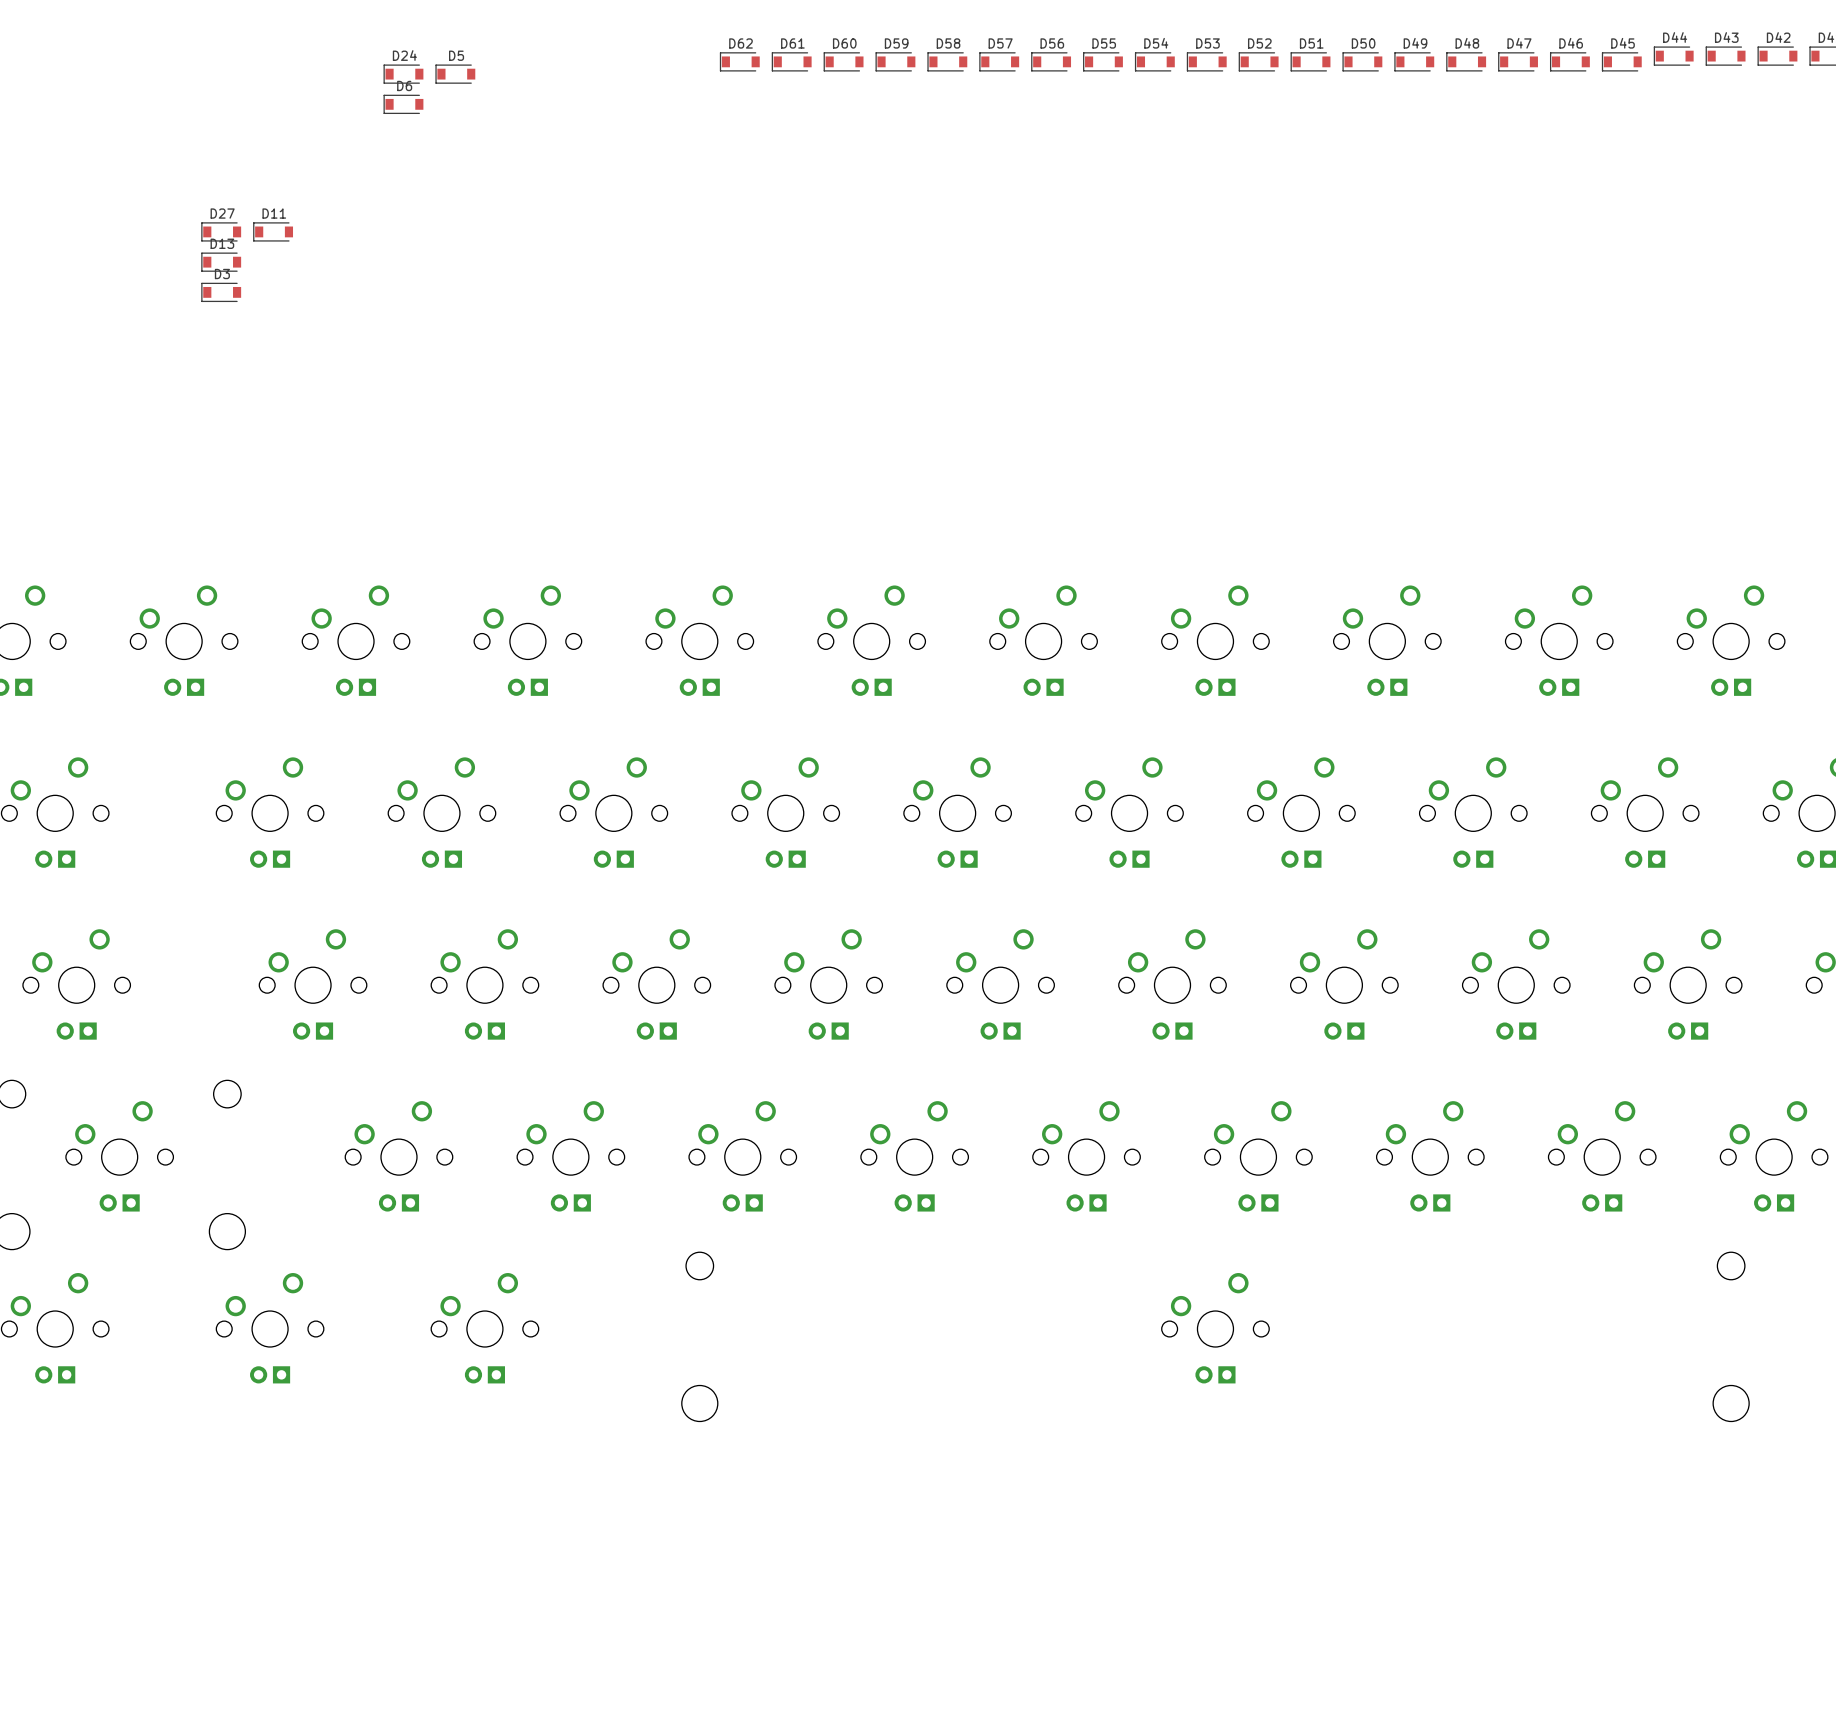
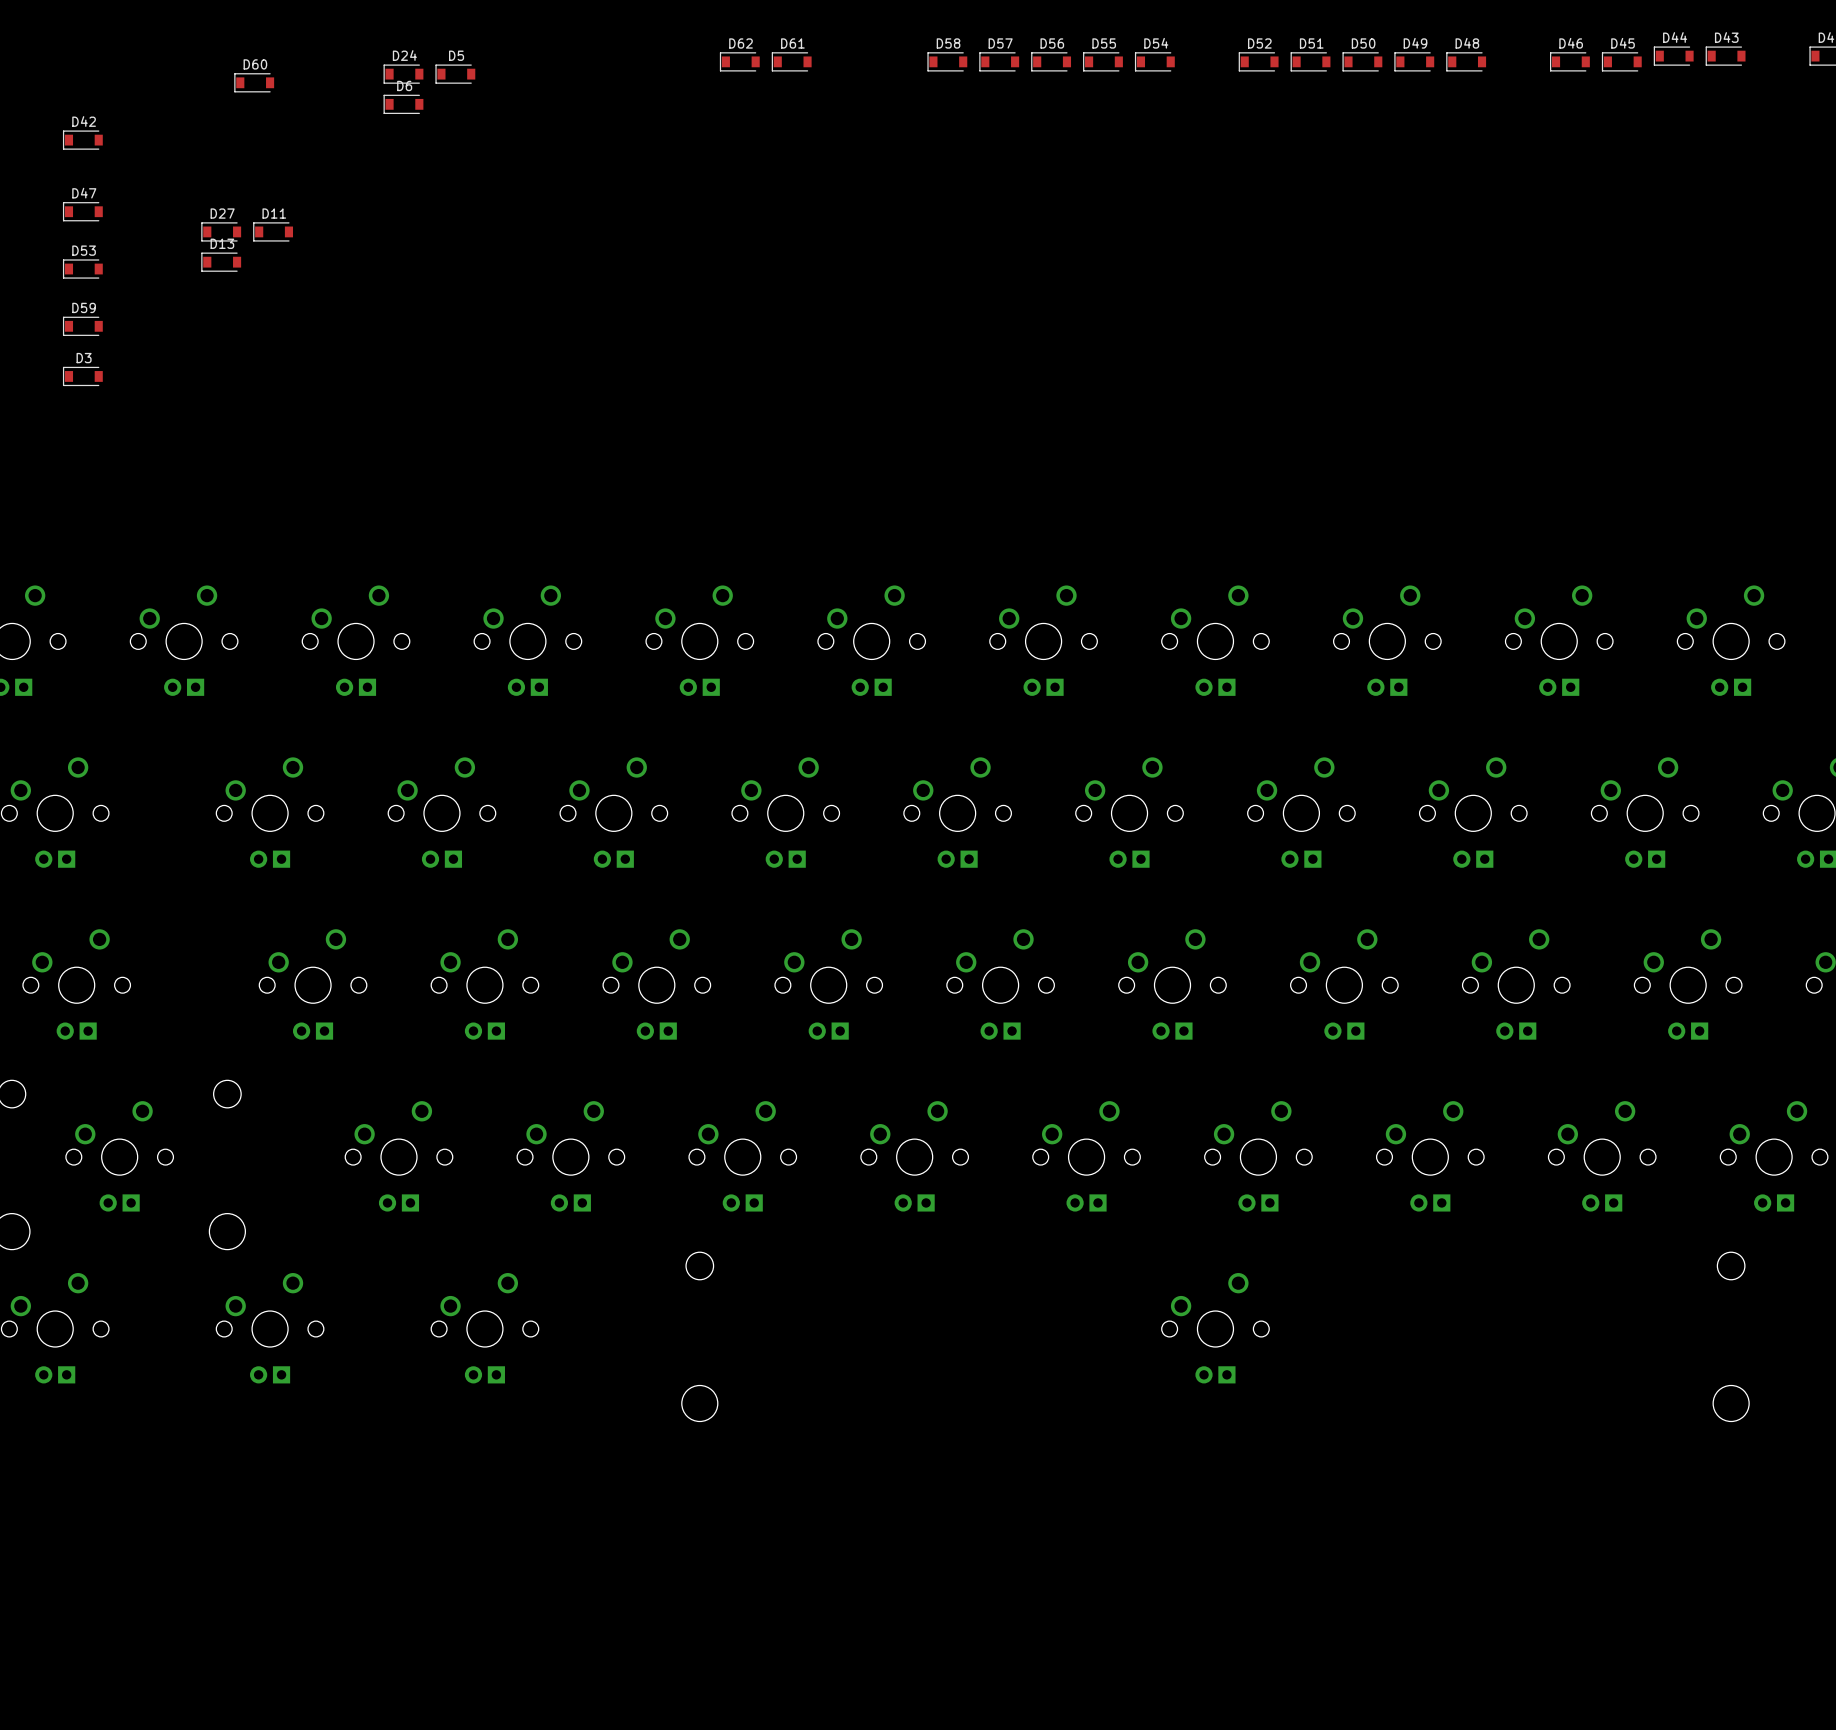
D42 position: (1777, 56) -> (82, 140)
D60 position: (843, 61) -> (254, 82)
D59 position: (895, 61) -> (82, 326)
D53 position: (1206, 61) -> (82, 269)
D47 position: (1518, 61) -> (82, 211)
D3 position: (221, 292) -> (82, 376)

